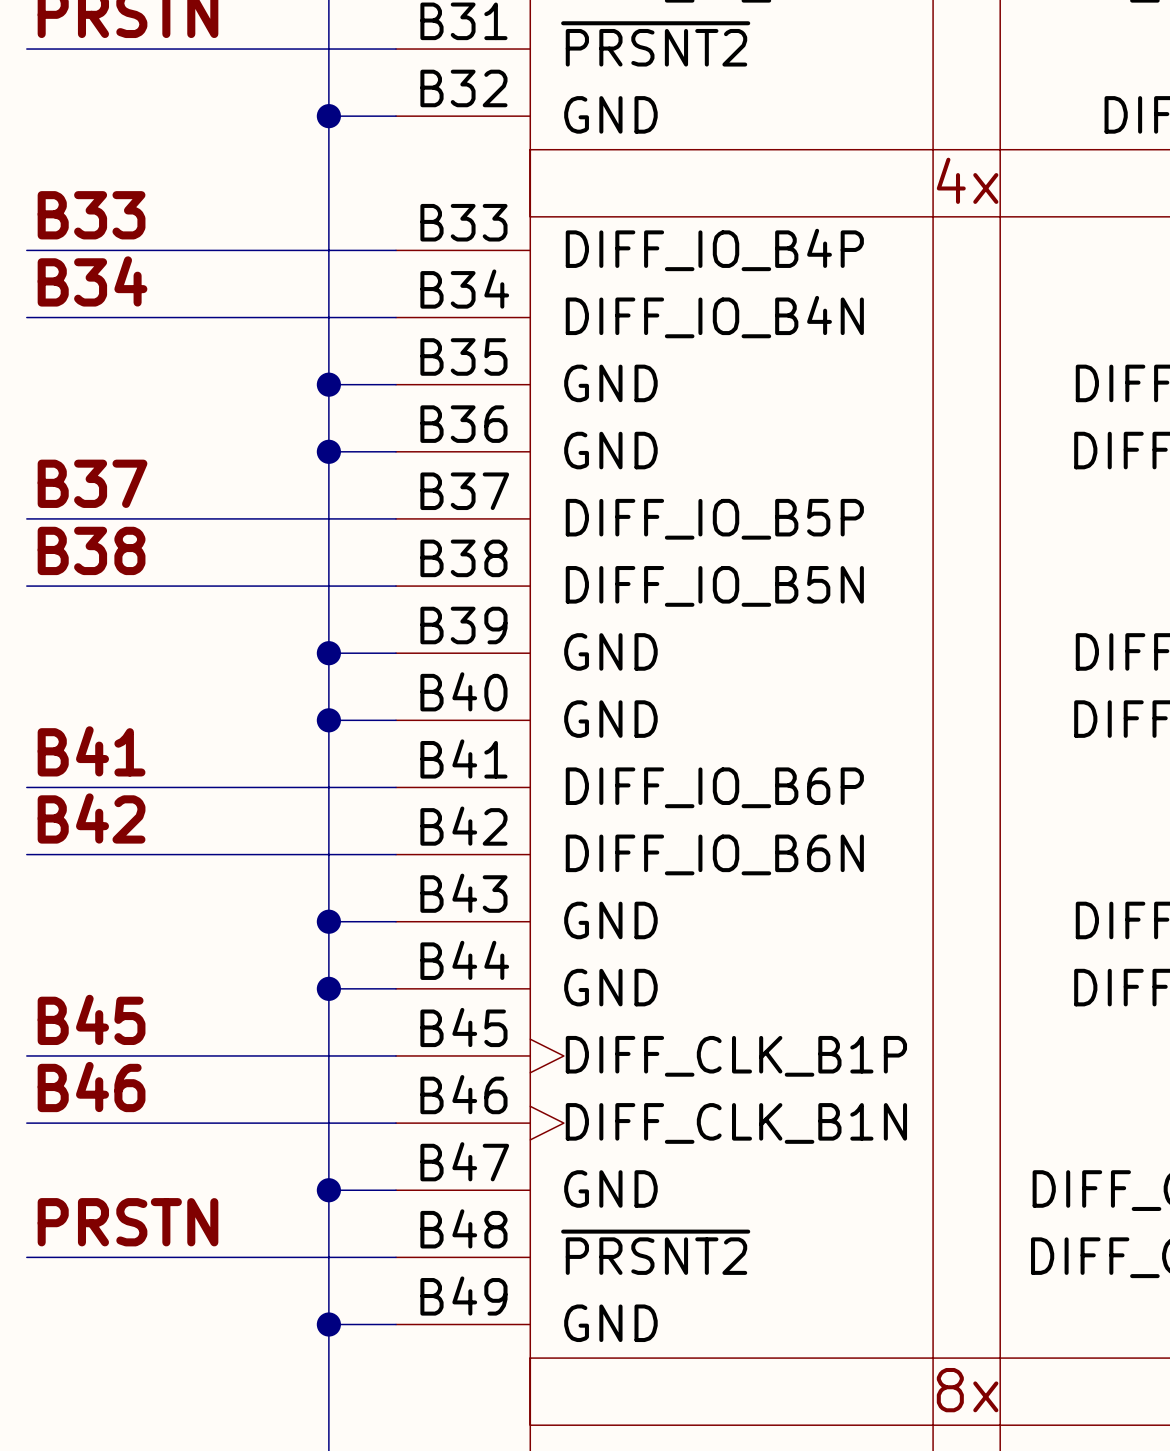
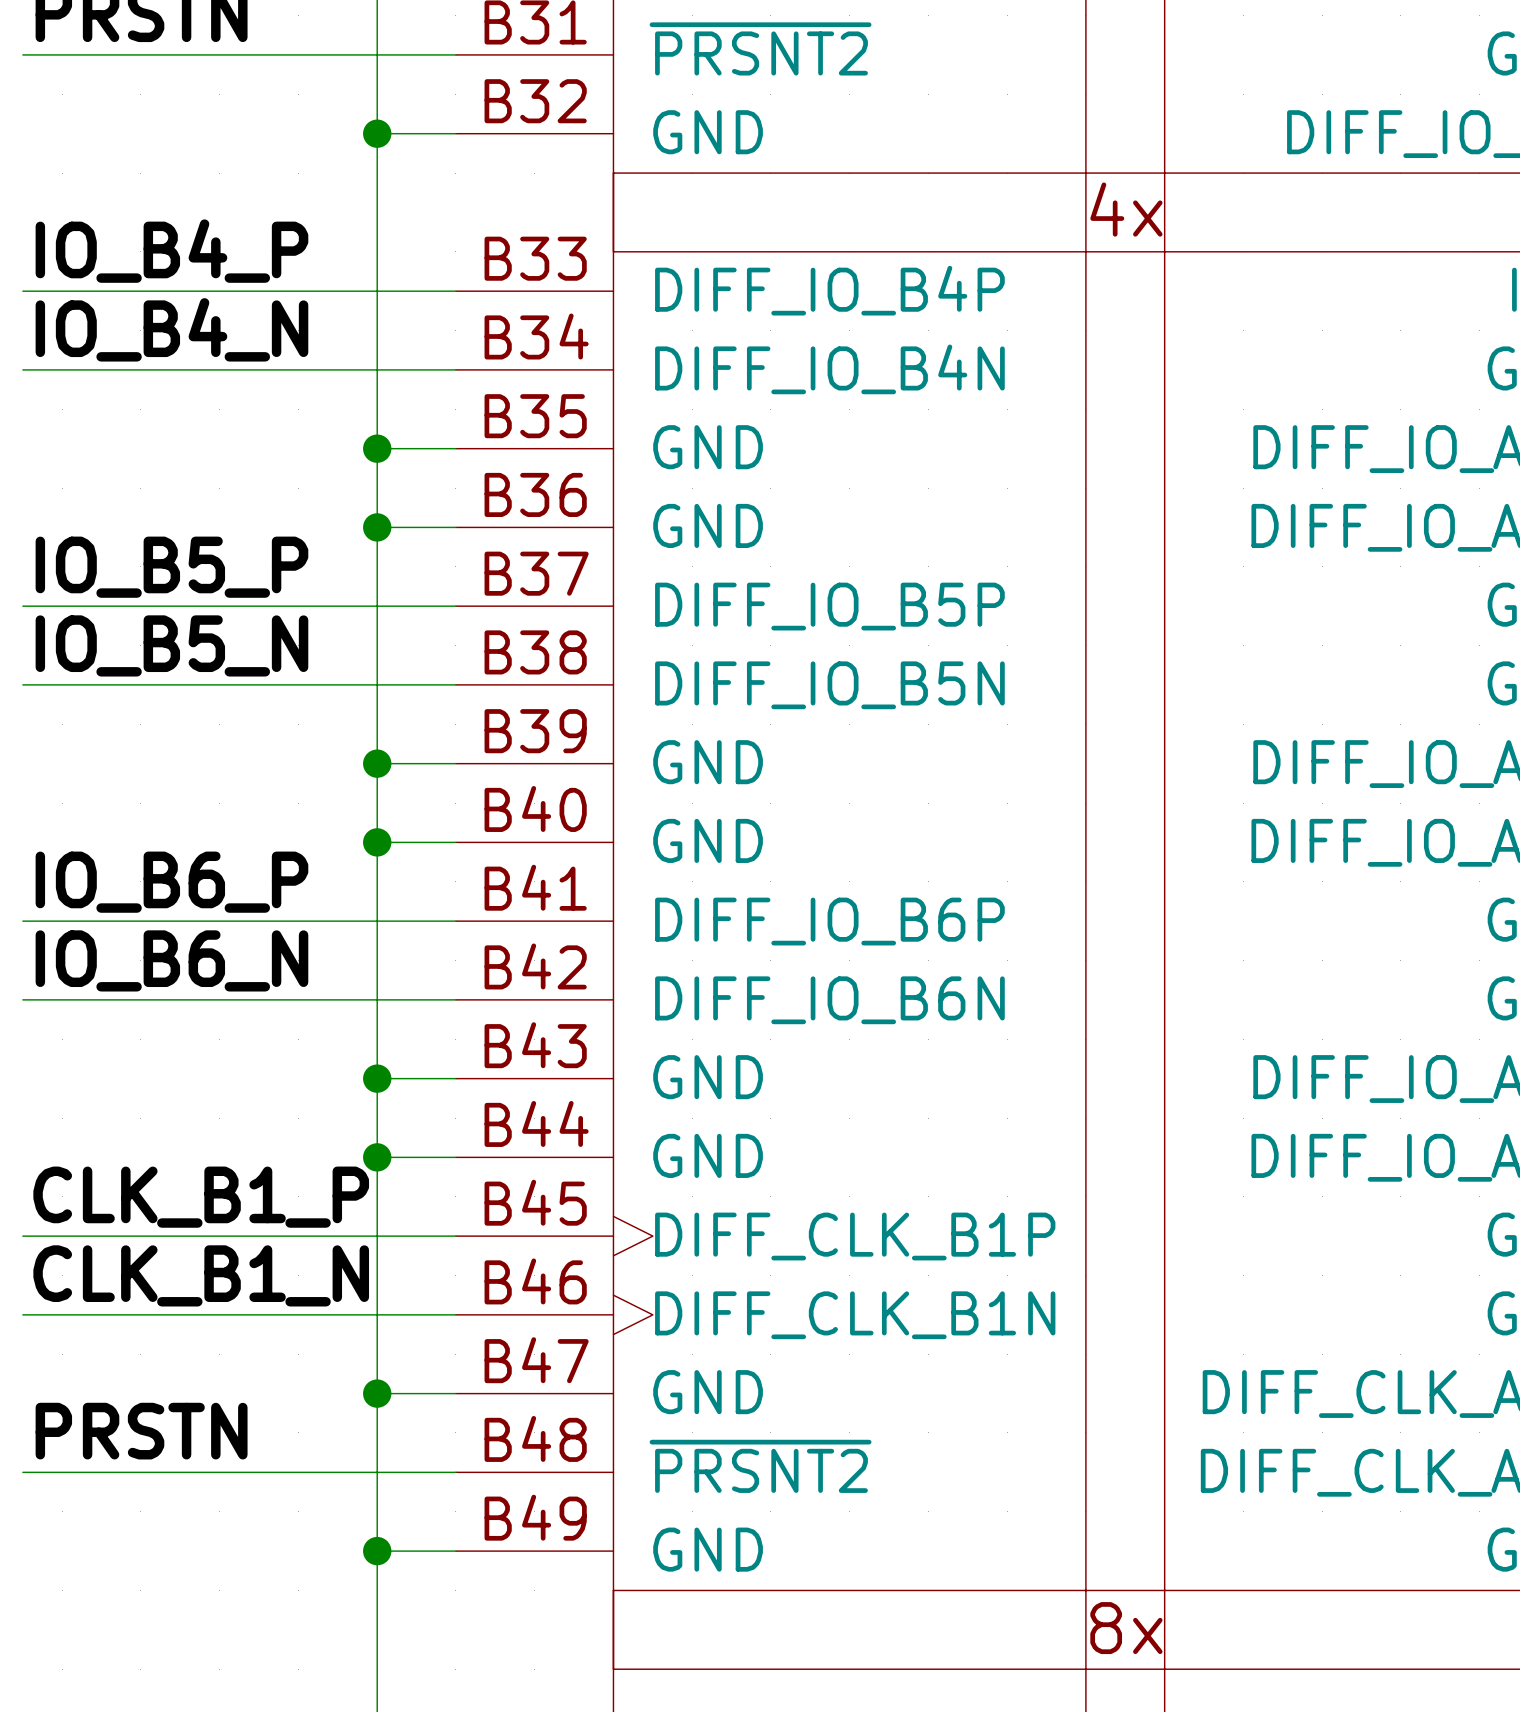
label: B33 (91, 215) -> IO_B4_P (171, 251)
label: B34 (92, 281) -> IO_B4_N (171, 329)
label: B37 (92, 483) -> IO_B5_P (171, 567)
label: B38 (91, 550) -> IO_B5_N (171, 645)
label: B41 (91, 751) -> IO_B6_P (171, 882)
label: B42 (91, 818) -> IO_B6_N (171, 960)
label: B45 (91, 1019) -> CLK_B1_P (201, 1197)
label: B46 (91, 1087) -> CLK_B1_N (201, 1275)

